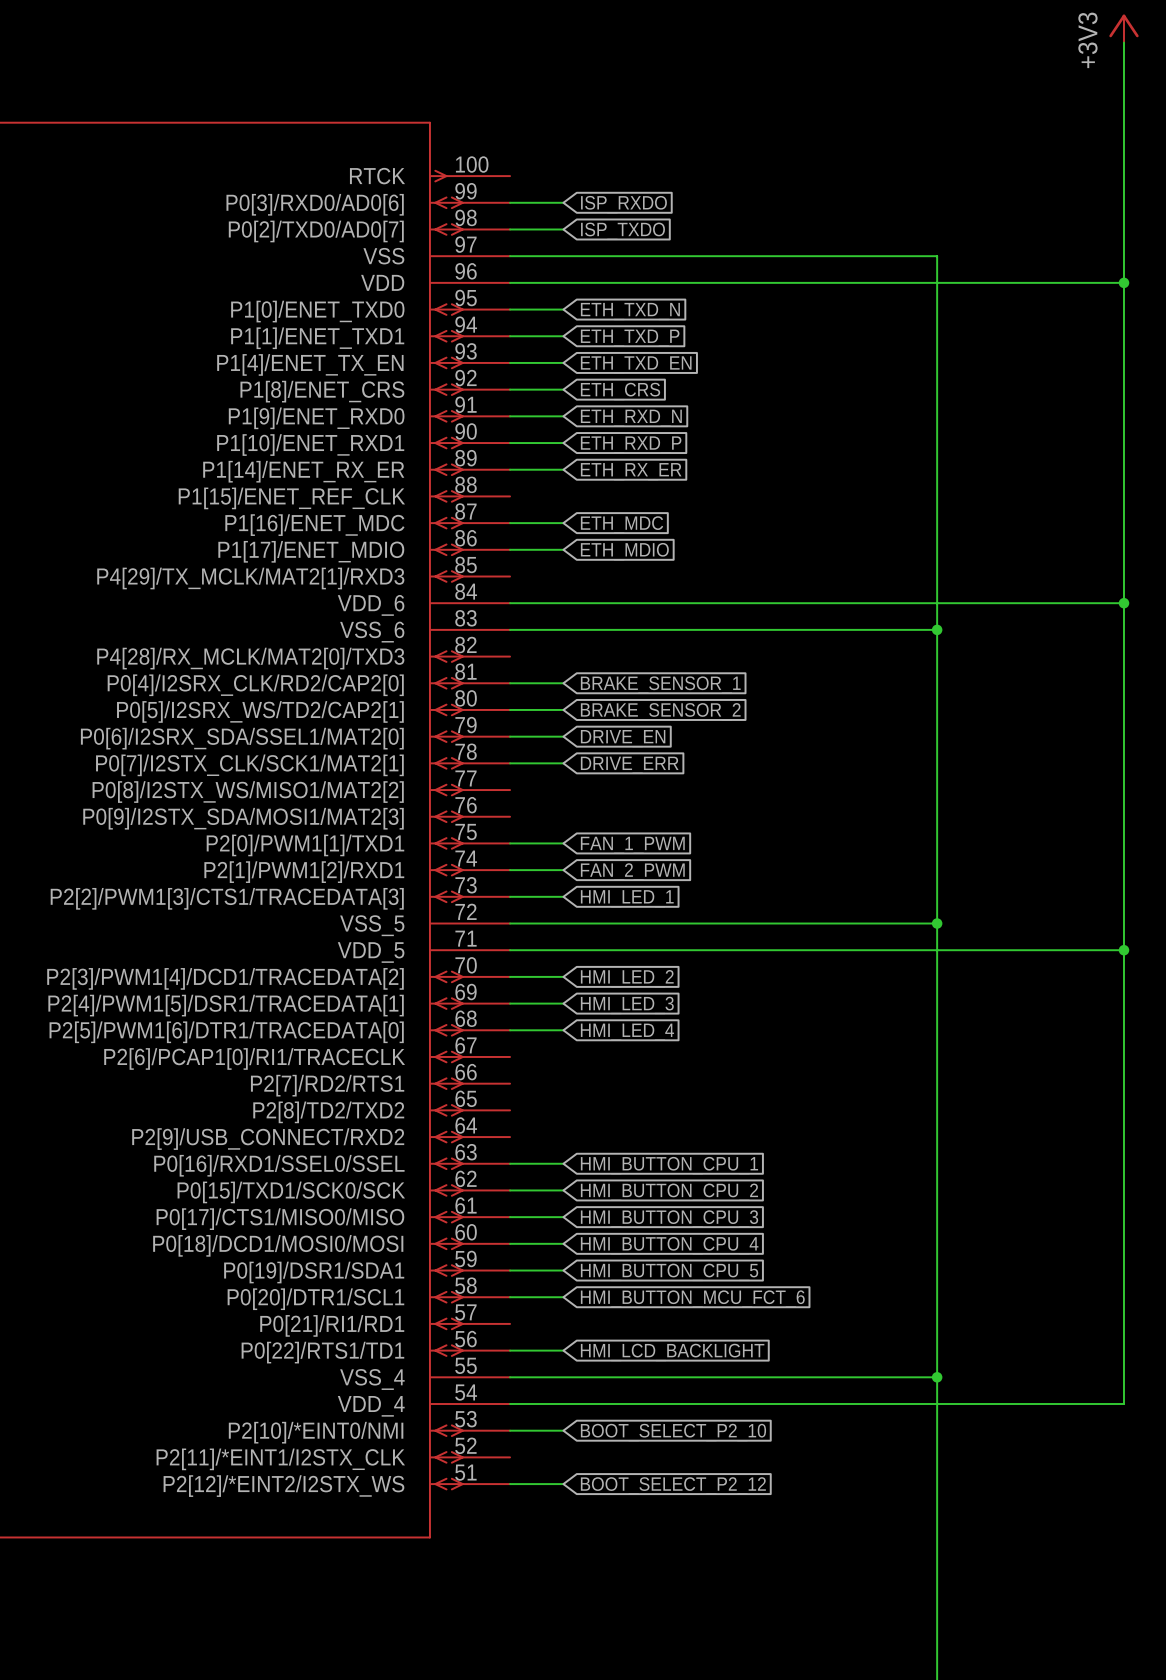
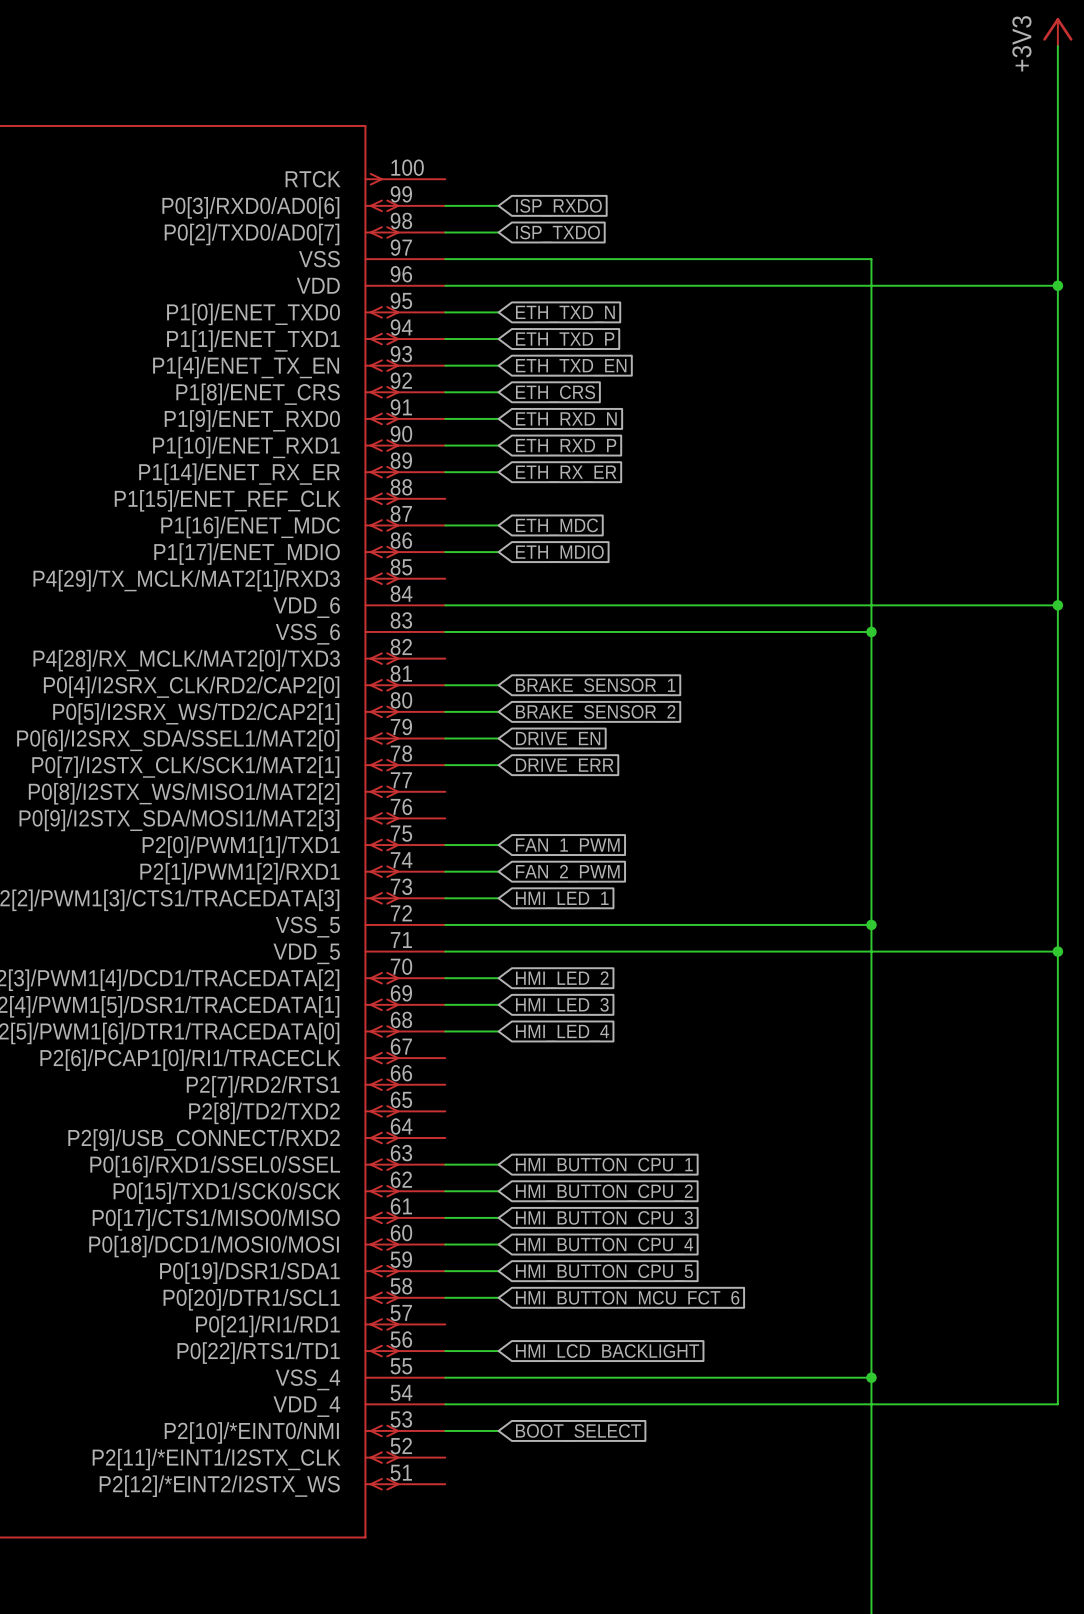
global label: BOOT_SELECT_P2_10 (673, 1432) -> BOOT_SELECT (578, 1432)
wire: (510, 1484) (563, 1484) -> none
global label: BOOT_SELECT_P2_12 (673, 1485) -> none

